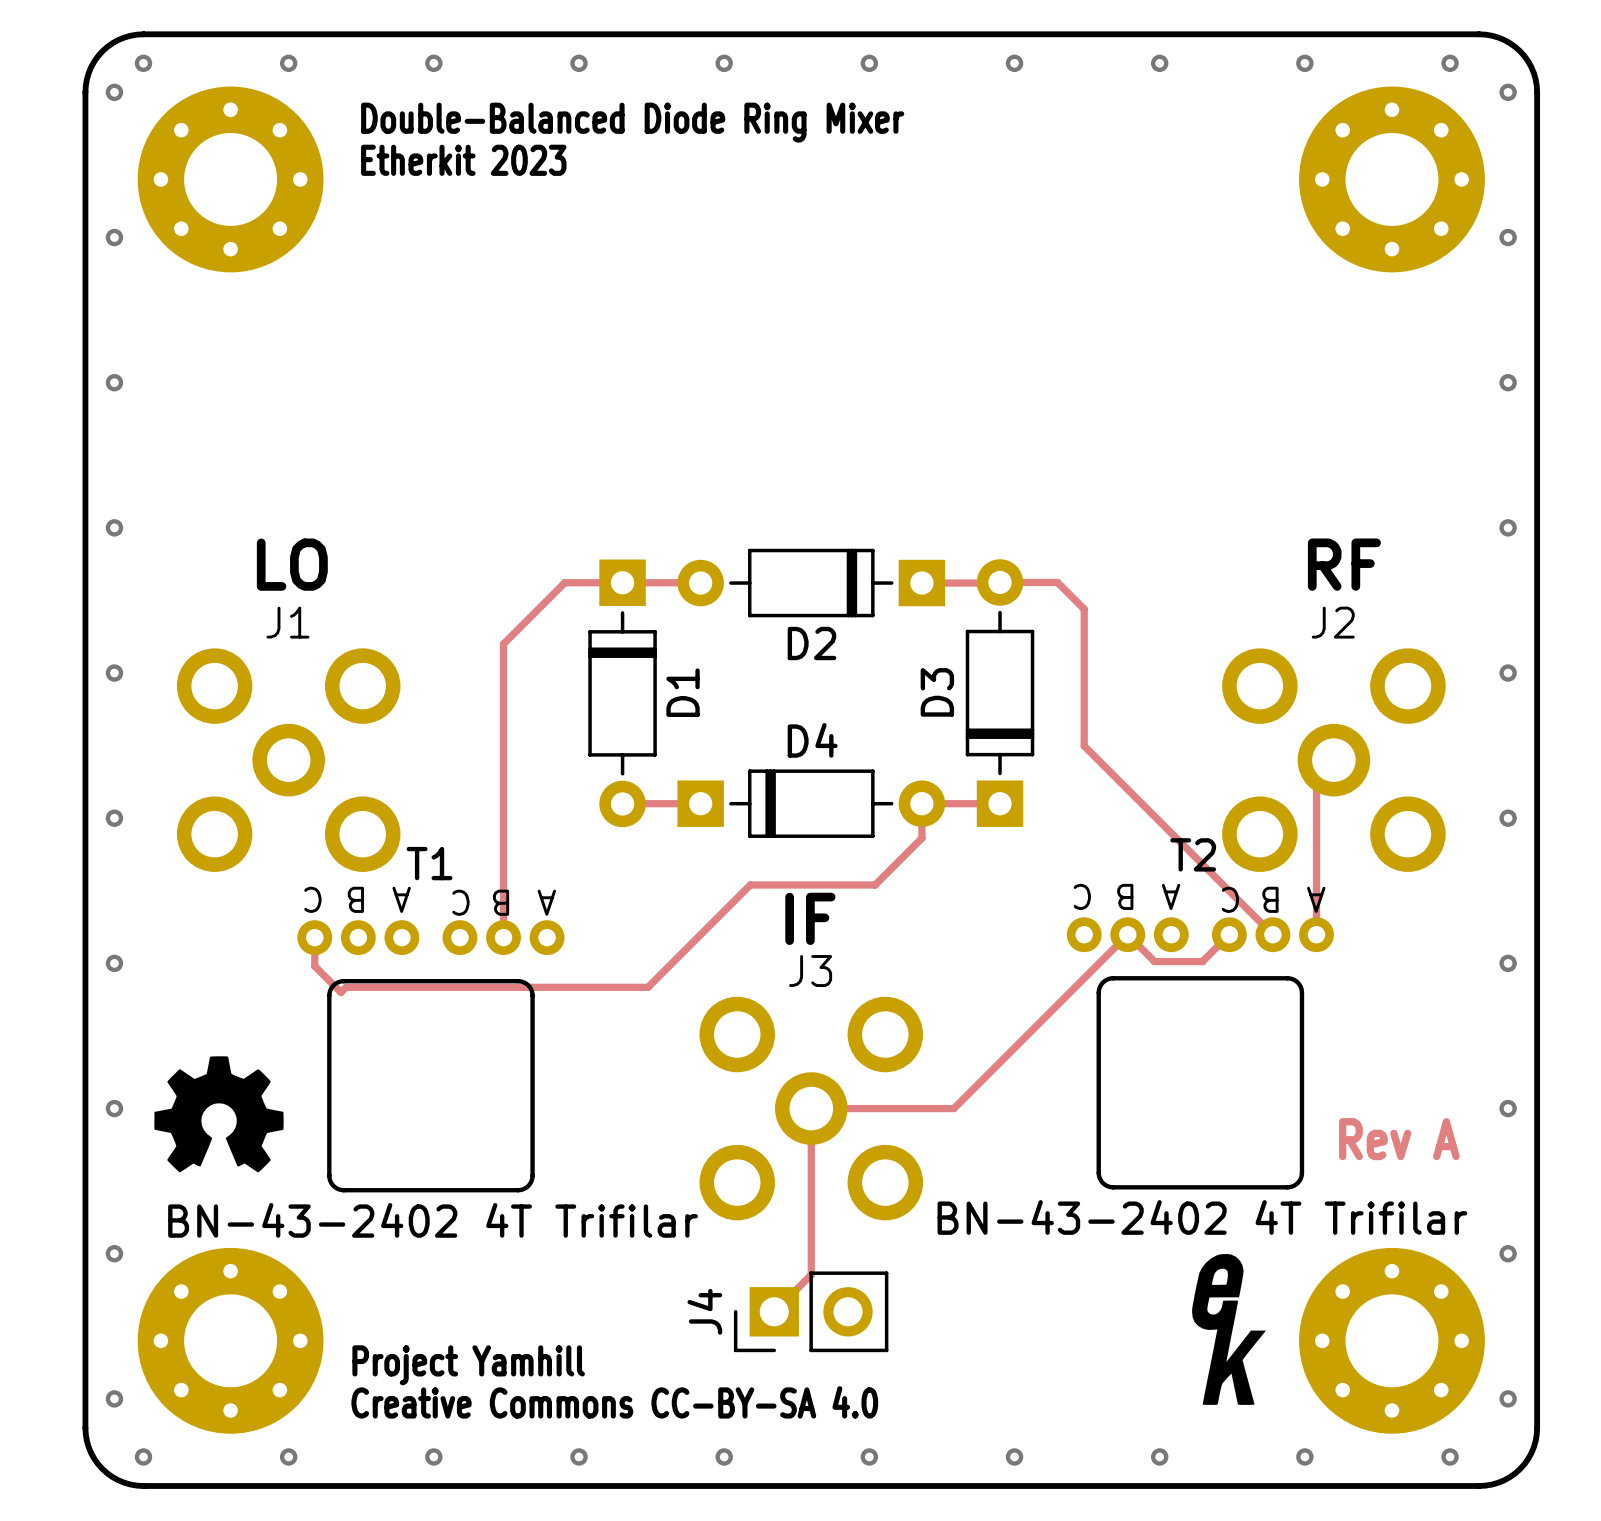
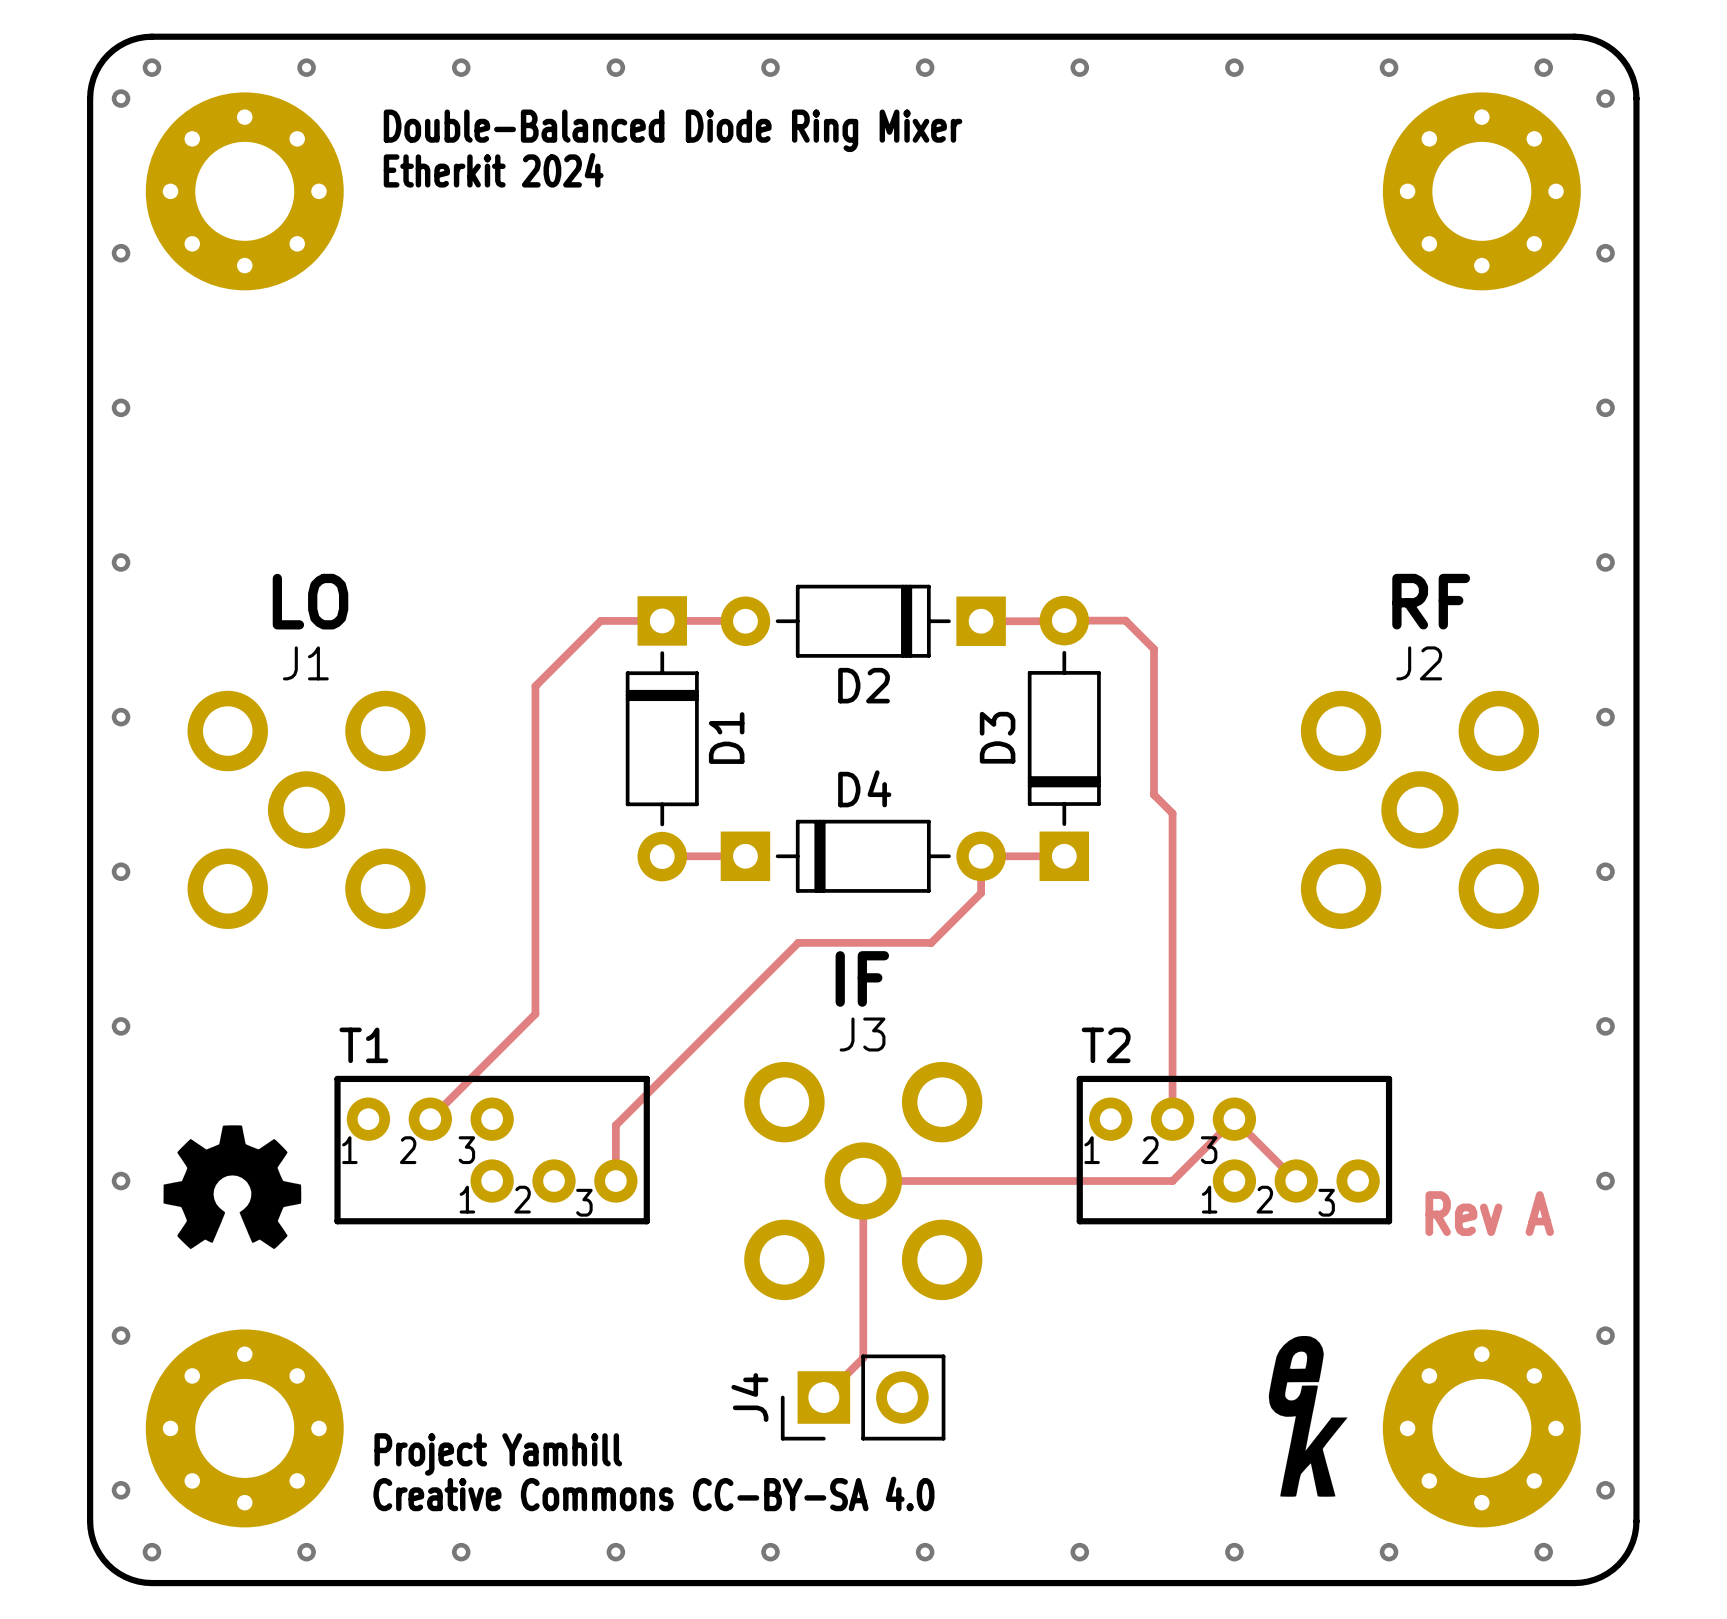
text: Etherkit 2023 (463, 160) -> Etherkit 2024 (493, 170)
track: (1101, 763) (1272, 934) -> (1172, 813) (1172, 1119)
track: (1316, 777) (1316, 934) -> none
T2 name position: T2 (1193, 854) -> T2 (1106, 1045)
T1 name position: T1 (429, 863) -> T1 (363, 1045)
T2 footprint: [1066, 917, 1334, 1190] -> [1076, 1075, 1393, 1225]
T1 footprint: [297, 920, 565, 1193] -> [334, 1075, 650, 1225]
track: (1229, 934) (1202, 961) (1154, 961) (1127, 934) (953, 1108) -> (1296, 1181) (1234, 1119) (1172, 1181) (1015, 1181)
track: (314, 937) (314, 966) (340, 992) (346, 987) (647, 987) -> (615, 1181) (615, 1125) (689, 1051)
track: none -> (535, 998) (535, 1014) (430, 1119)
T2 value: BN-43-2402 4T Trifilar (1202, 1217) -> none
T1 value: BN-43-2402 4T Trifilar (433, 1220) -> none

